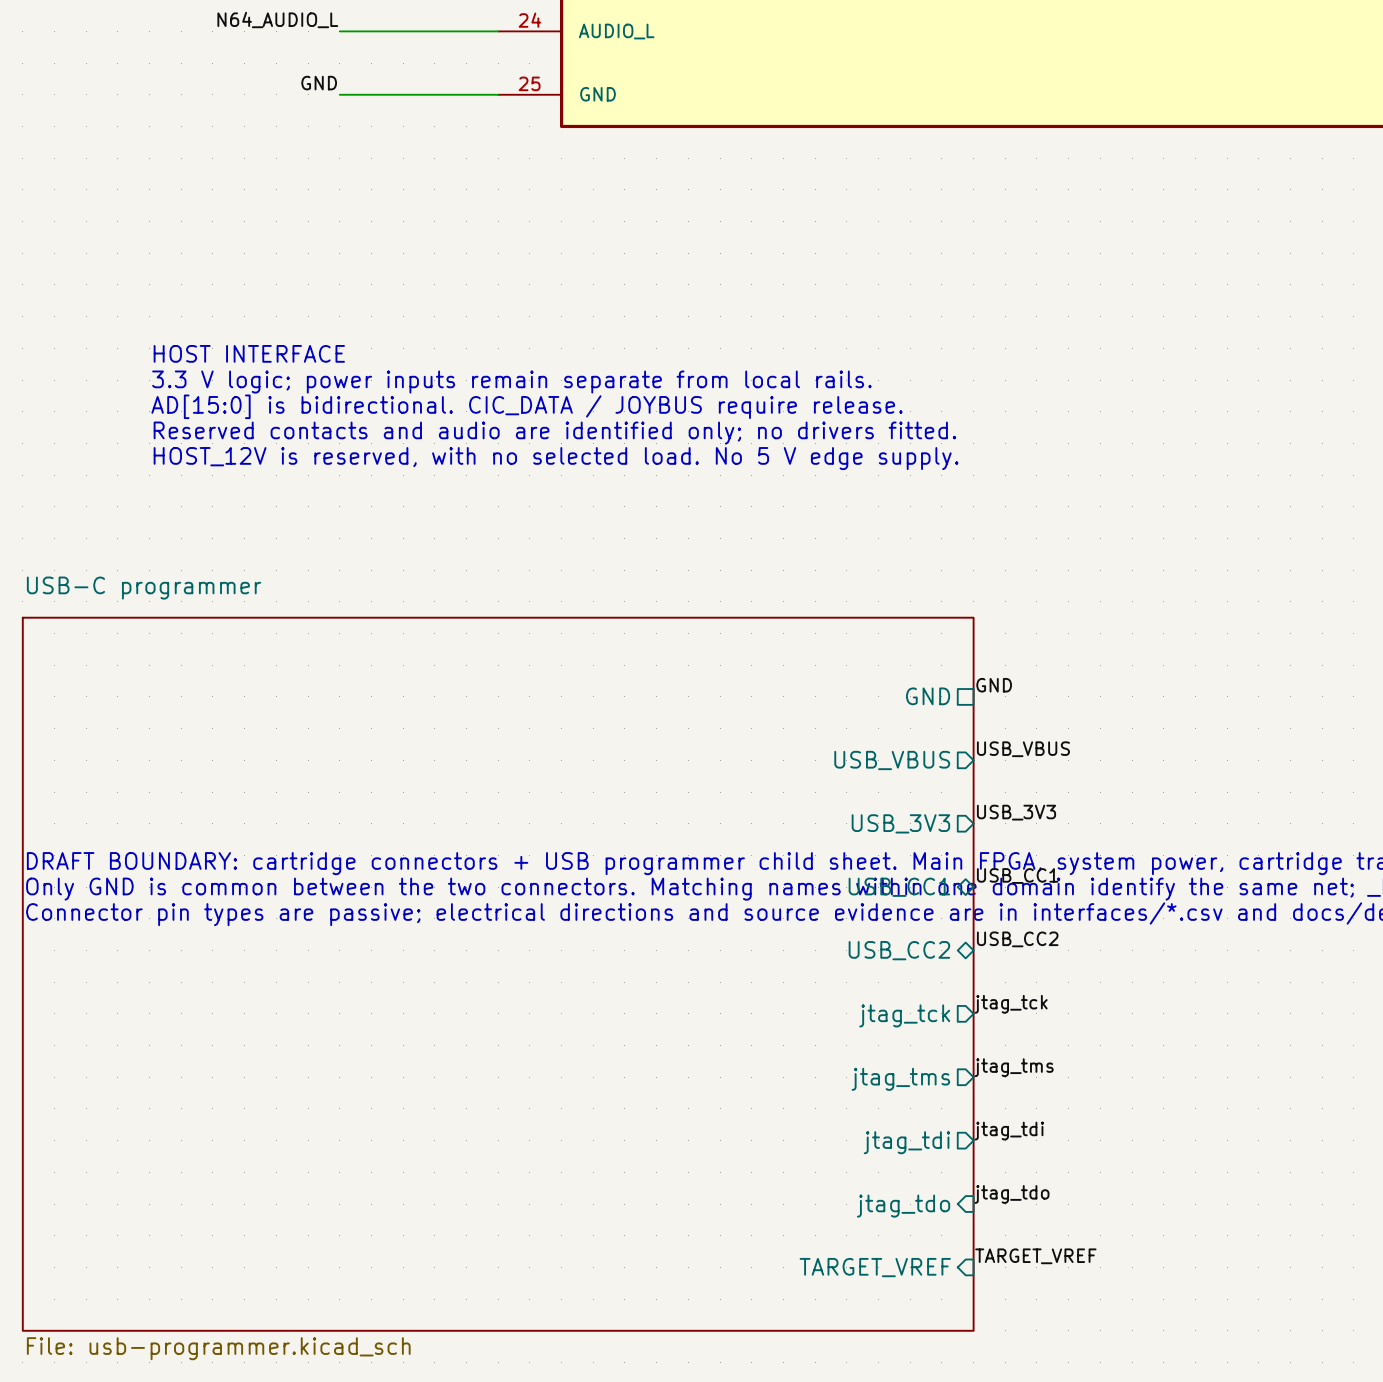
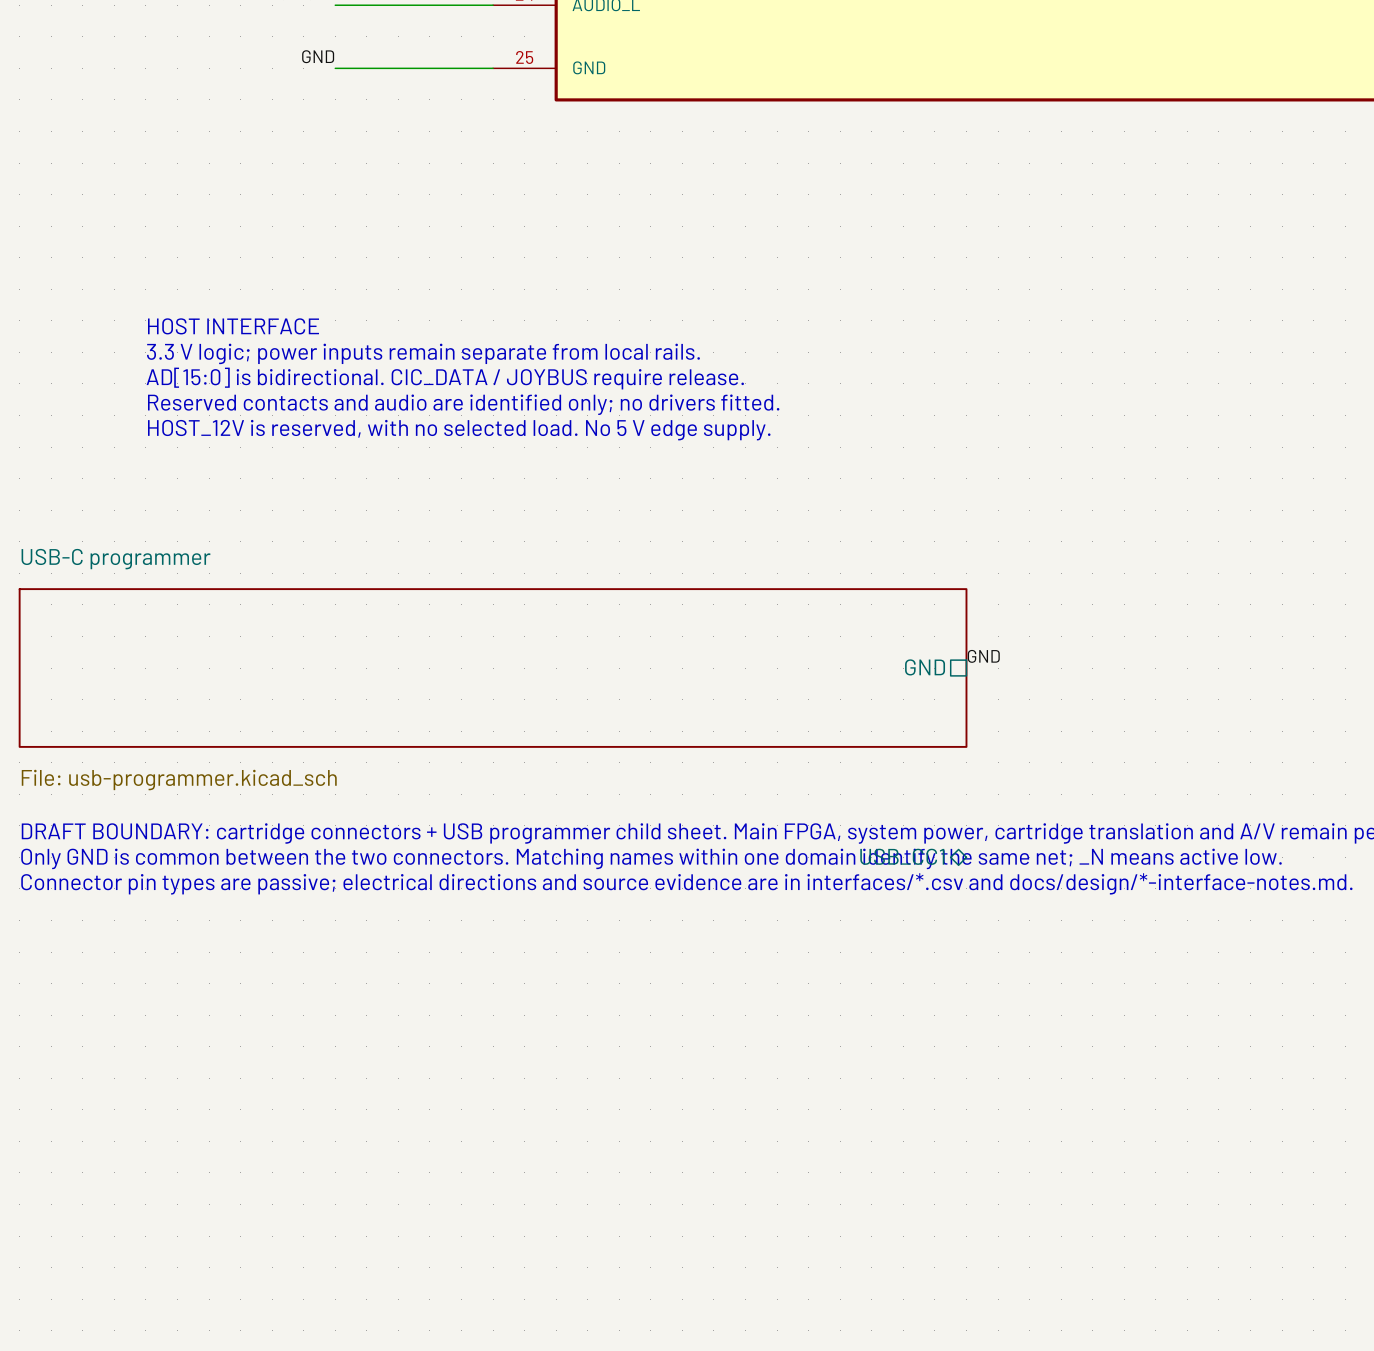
sheet USB-C programmer: none -> File: usb-programmer.kicad_sch (493, 668)
label: USB_VBUS (1023, 749) -> none
sheet pin: USB_VBUS (892, 760) -> none
label: USB_3V3 (1016, 812) -> none
sheet pin: USB_3V3 (900, 823) -> none
label: USB_CC1 (1017, 876) -> none
label: USB_CC2 (1017, 939) -> none
sheet pin: USB_CC2 (899, 950) -> none
sheet USB-C programmer: File: usb-programmer.kicad_sch (498, 974) -> none
label: jtag_tck (1011, 1004) -> none
sheet pin: jtag_tck (904, 1015) -> none
label: jtag_tms (1014, 1067) -> none
sheet pin: jtag_tms (900, 1079) -> none
label: jtag_tdi (1009, 1131) -> none
sheet pin: jtag_tdi (906, 1142) -> none
label: jtag_tdo (1011, 1194) -> none
sheet pin: jtag_tdo (903, 1206) -> none
label: TARGET_VREF (1035, 1256) -> none
sheet pin: TARGET_VREF (875, 1267) -> none

